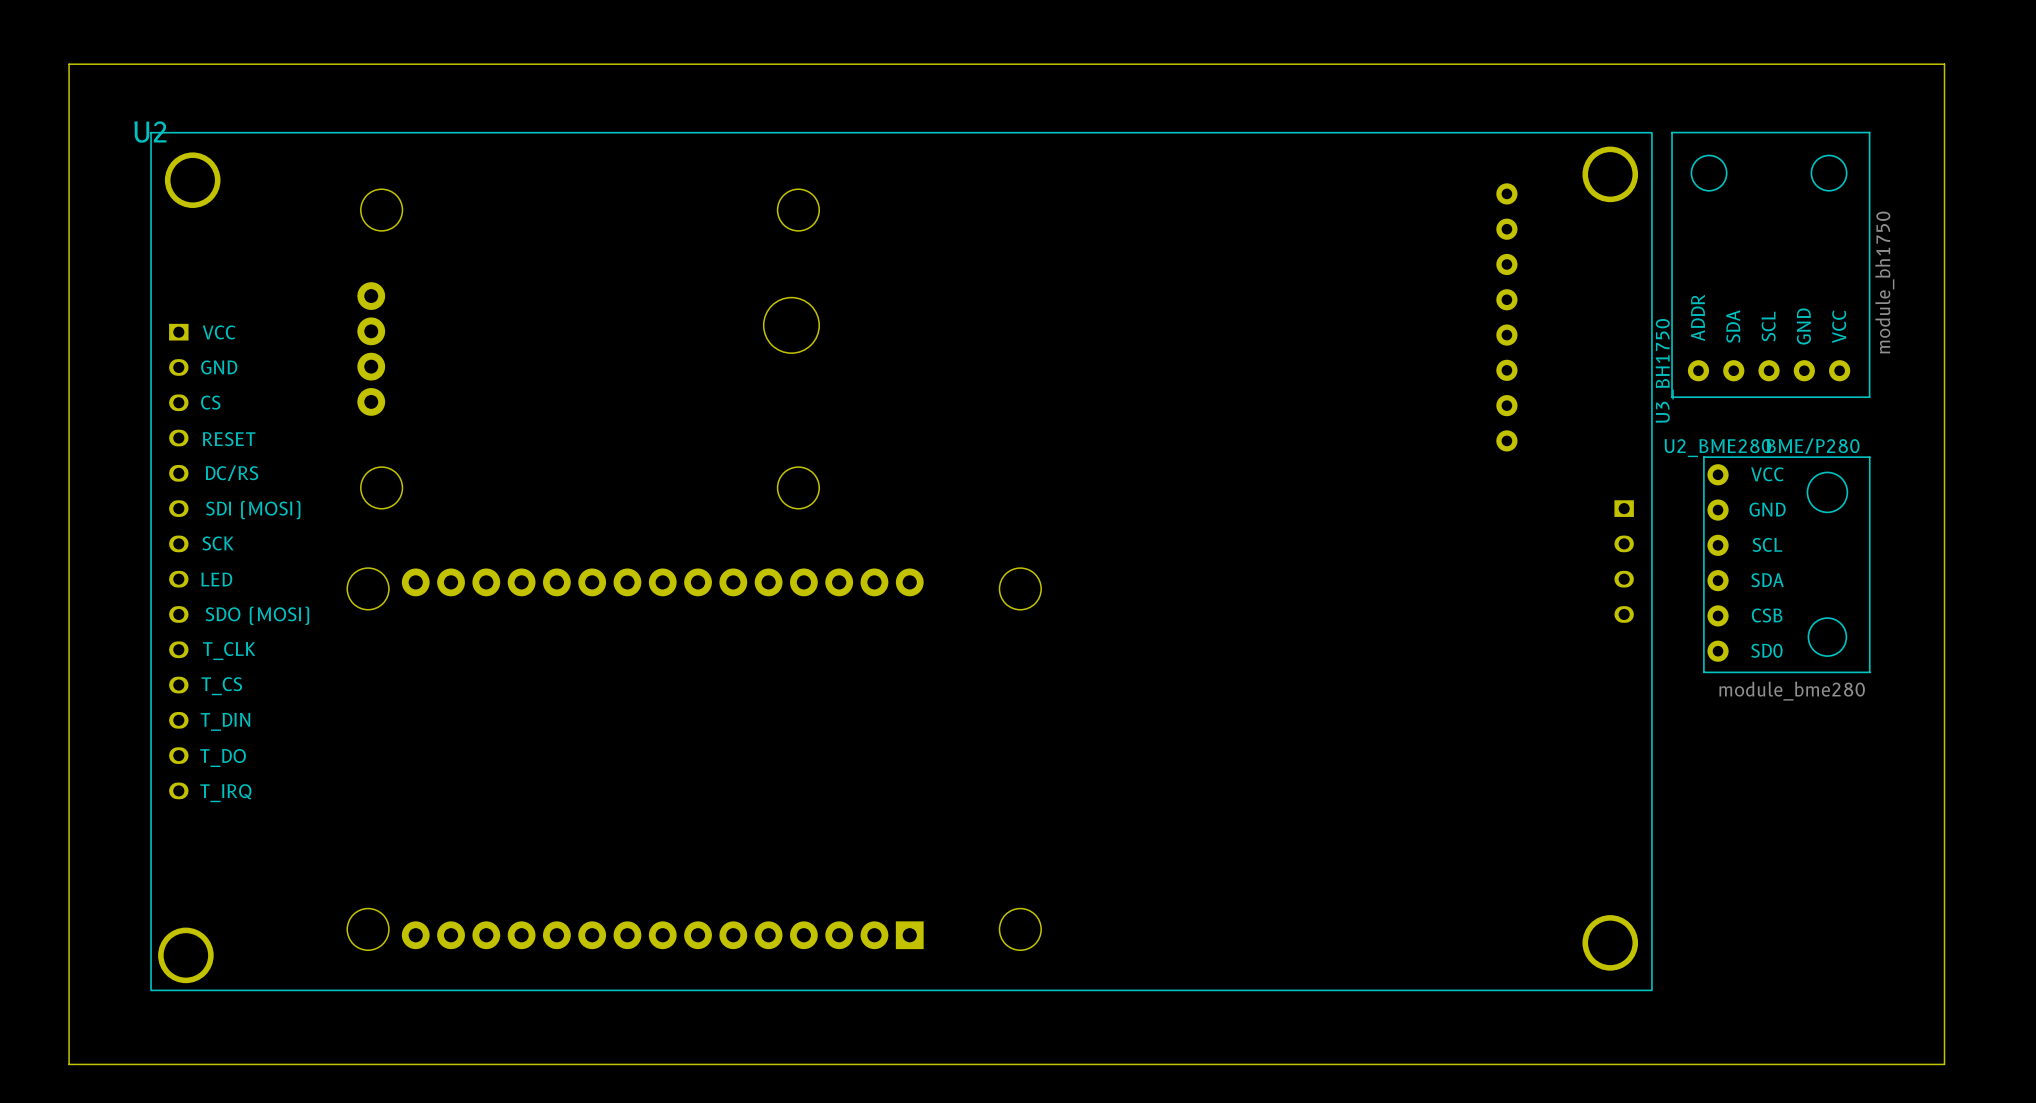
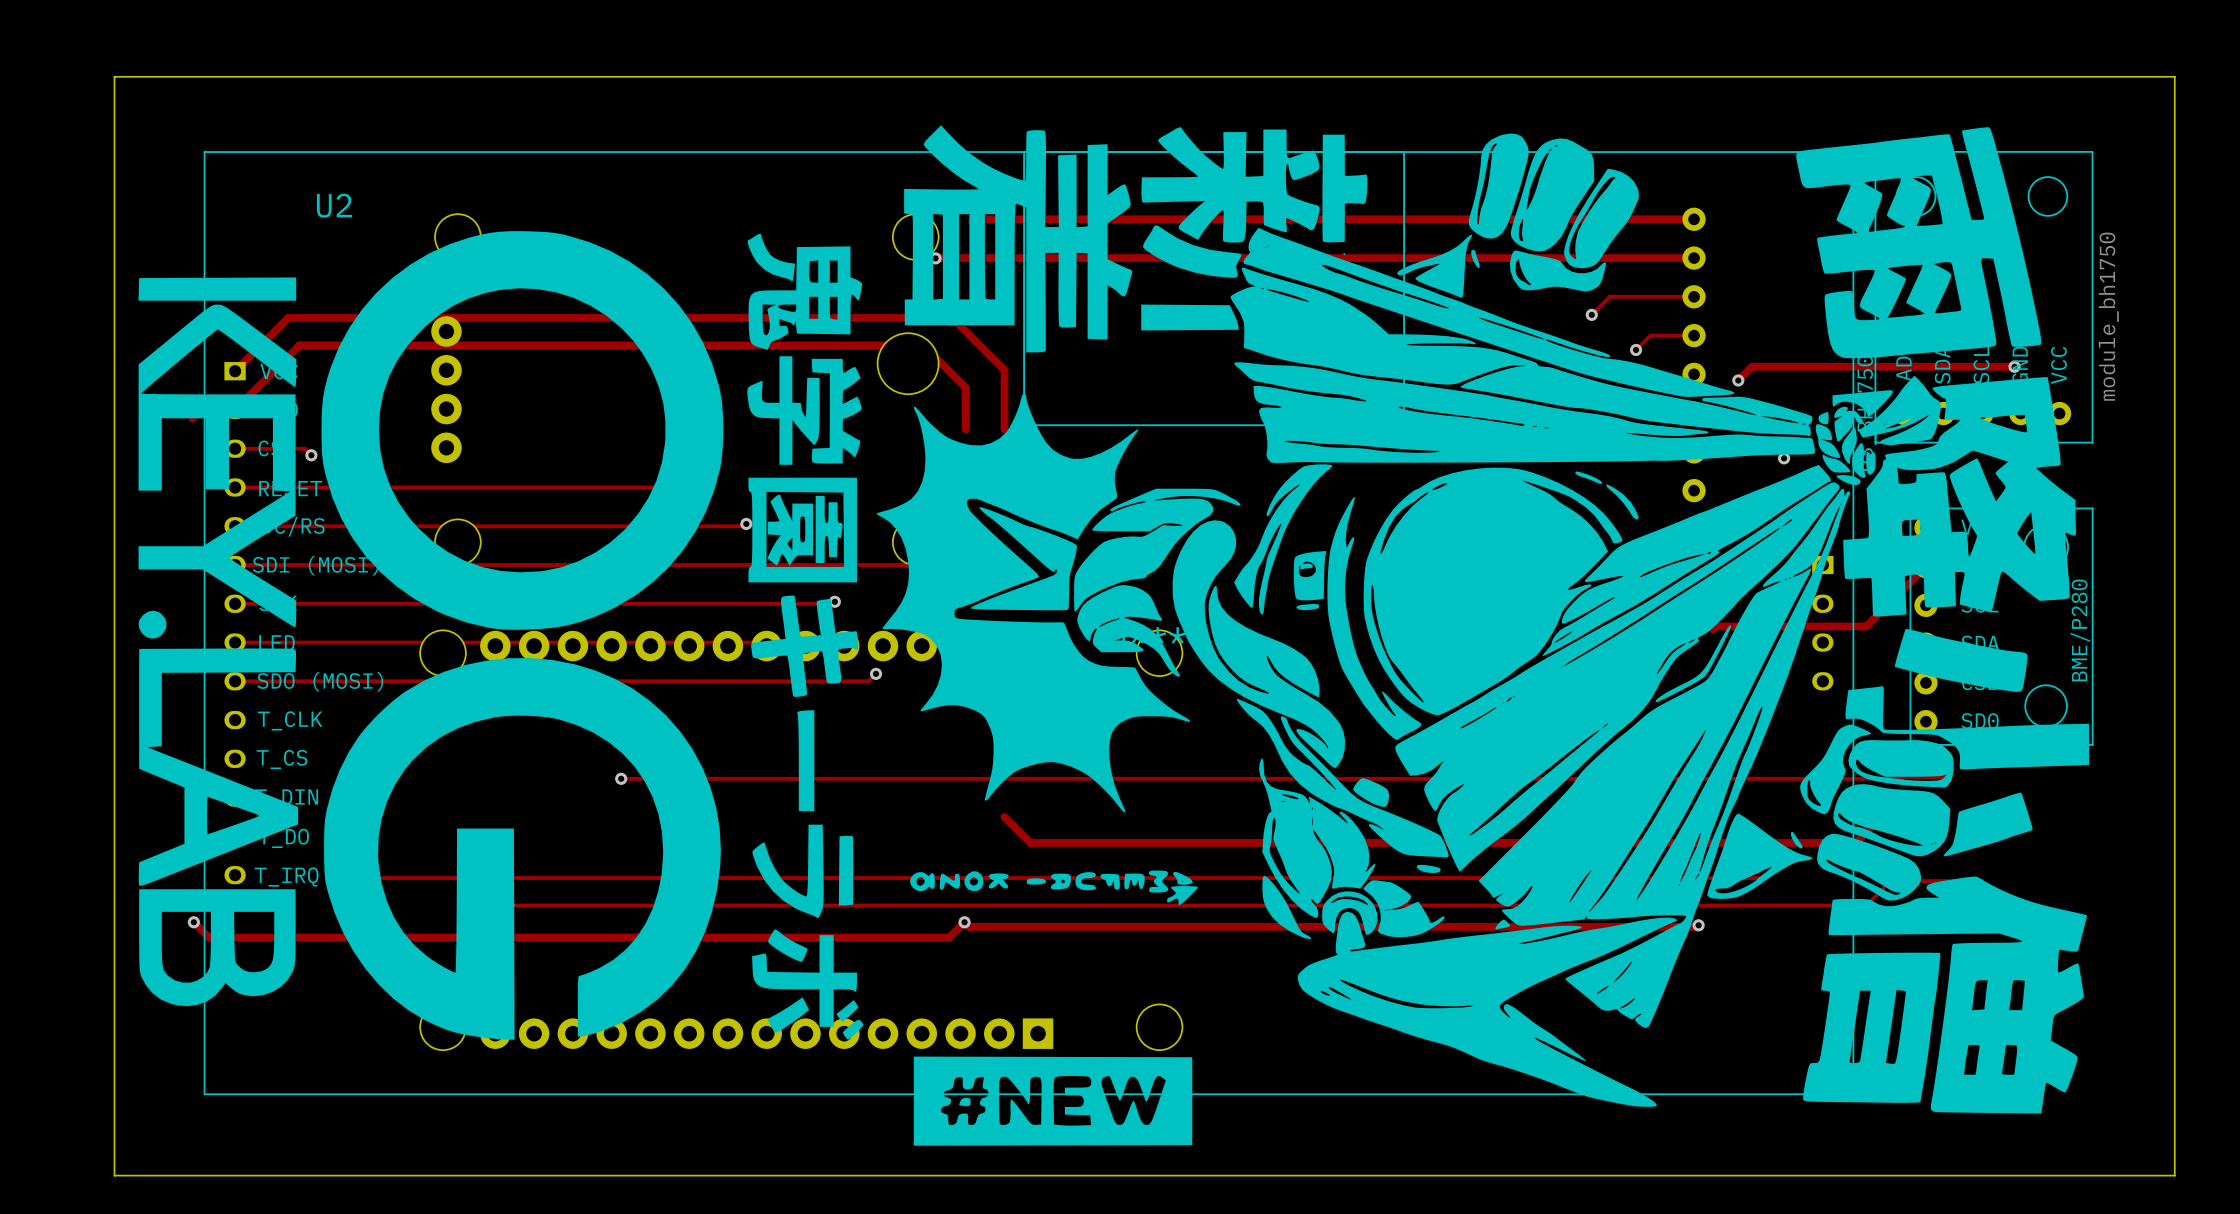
U2 footprint: [150, 131, 1653, 992] -> [203, 151, 1855, 1096]
U2 name position: U2 (150, 132) -> U2 (334, 205)
track: none -> (1694, 219) (974, 219) (972, 221)
via: none -> (935, 258)
track: none -> (1694, 258) (935, 258)
track: none -> (1694, 296) (1609, 296) (1591, 314)
via: none -> (1591, 314)
track: none -> (1694, 335) (1650, 335) (1636, 349)
via: none -> (1636, 349)
track: none -> (2014, 366) (1752, 366) (1738, 380)
via: none -> (2014, 366)
track: none -> (235, 371) (288, 317) (952, 317) (1004, 370) (1004, 429)
via: none -> (1738, 380)
track: none -> (192, 418) (201, 409) (235, 409) (299, 345) (923, 345) (965, 387) (965, 429)
track: none -> (235, 448) (304, 448) (311, 455)
via: none -> (311, 455)
via: none -> (1784, 458)
track: none -> (235, 487) (653, 488)
U2_BME280 text rotation: 0° (1813, 446) -> 90° counterclockwise (2080, 630)
U2_BME280 text position: BME/P280 (1813, 446) -> BME/P280 (2080, 630)
U2_BME280 name: U2_BME280 (1717, 448) -> none
track: none -> (746, 523) (744, 526) (235, 526)
via: none -> (746, 523)
track: none -> (235, 565) (904, 565) (906, 566)
track: none -> (1925, 566) (1866, 626) (1715, 626) (1712, 629)
track: none -> (834, 601) (832, 603) (235, 603)
via: none -> (834, 601)
part: none -> (1113, 635)
track: none -> (235, 642) (834, 642)
track: none -> (876, 673) (868, 681) (235, 681)
via: none -> (876, 673)
U2_BME280 value: module_bme280 (1792, 691) -> none
track: none -> (1945, 777) (1904, 775) (1901, 778) (621, 778)
via: none -> (621, 778)
track: none -> (1004, 816) (1030, 842) (1855, 842) (1871, 827)
track: none -> (328, 874) (331, 878) (1761, 878) (1762, 879)
track: none -> (1982, 881) (1890, 881) (1866, 905) (508, 905)
track: none -> (193, 922) (209, 937) (949, 937) (964, 922) (969, 926) (1697, 926) (1698, 925)
via: none -> (193, 922)
via: none -> (964, 922)
via: none -> (1698, 925)

